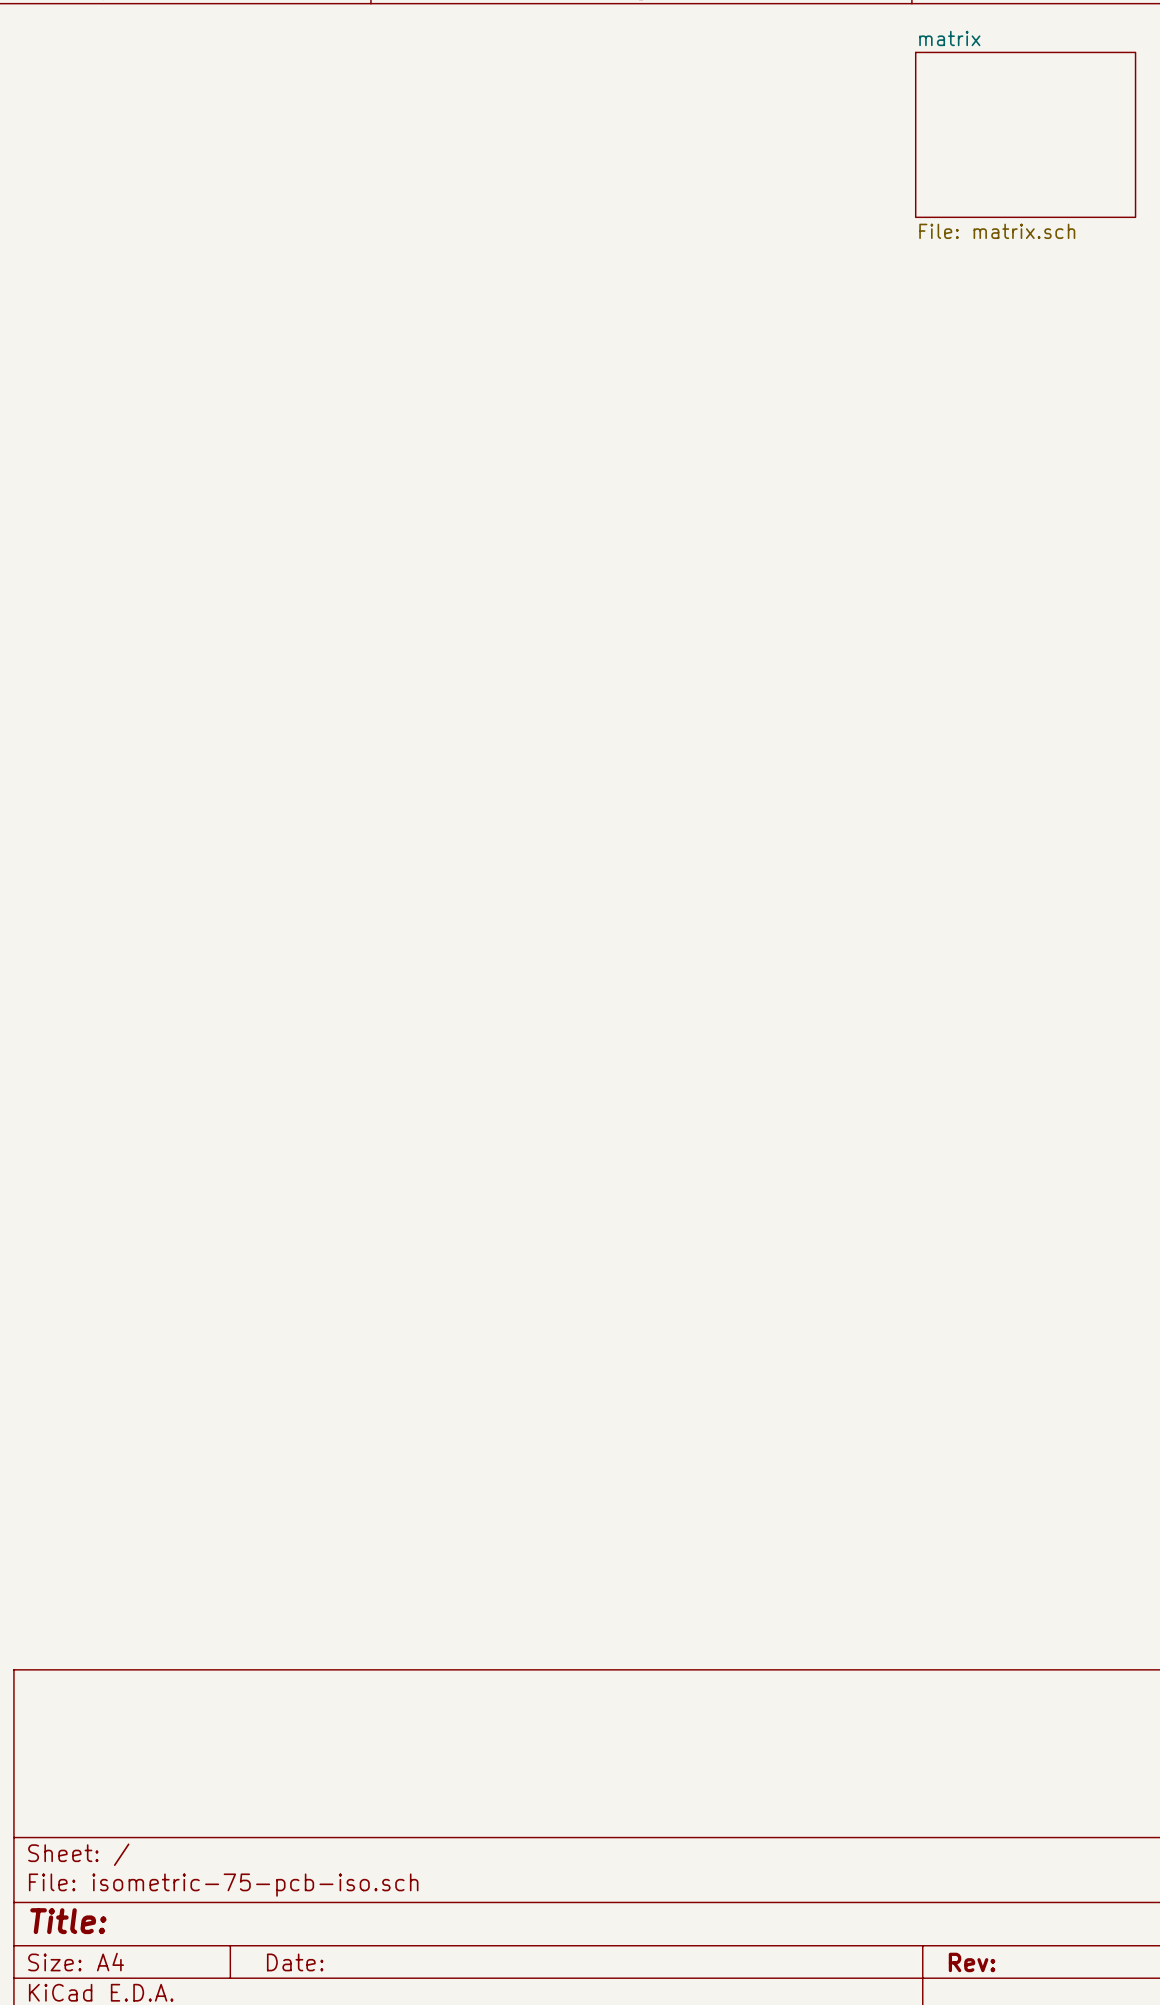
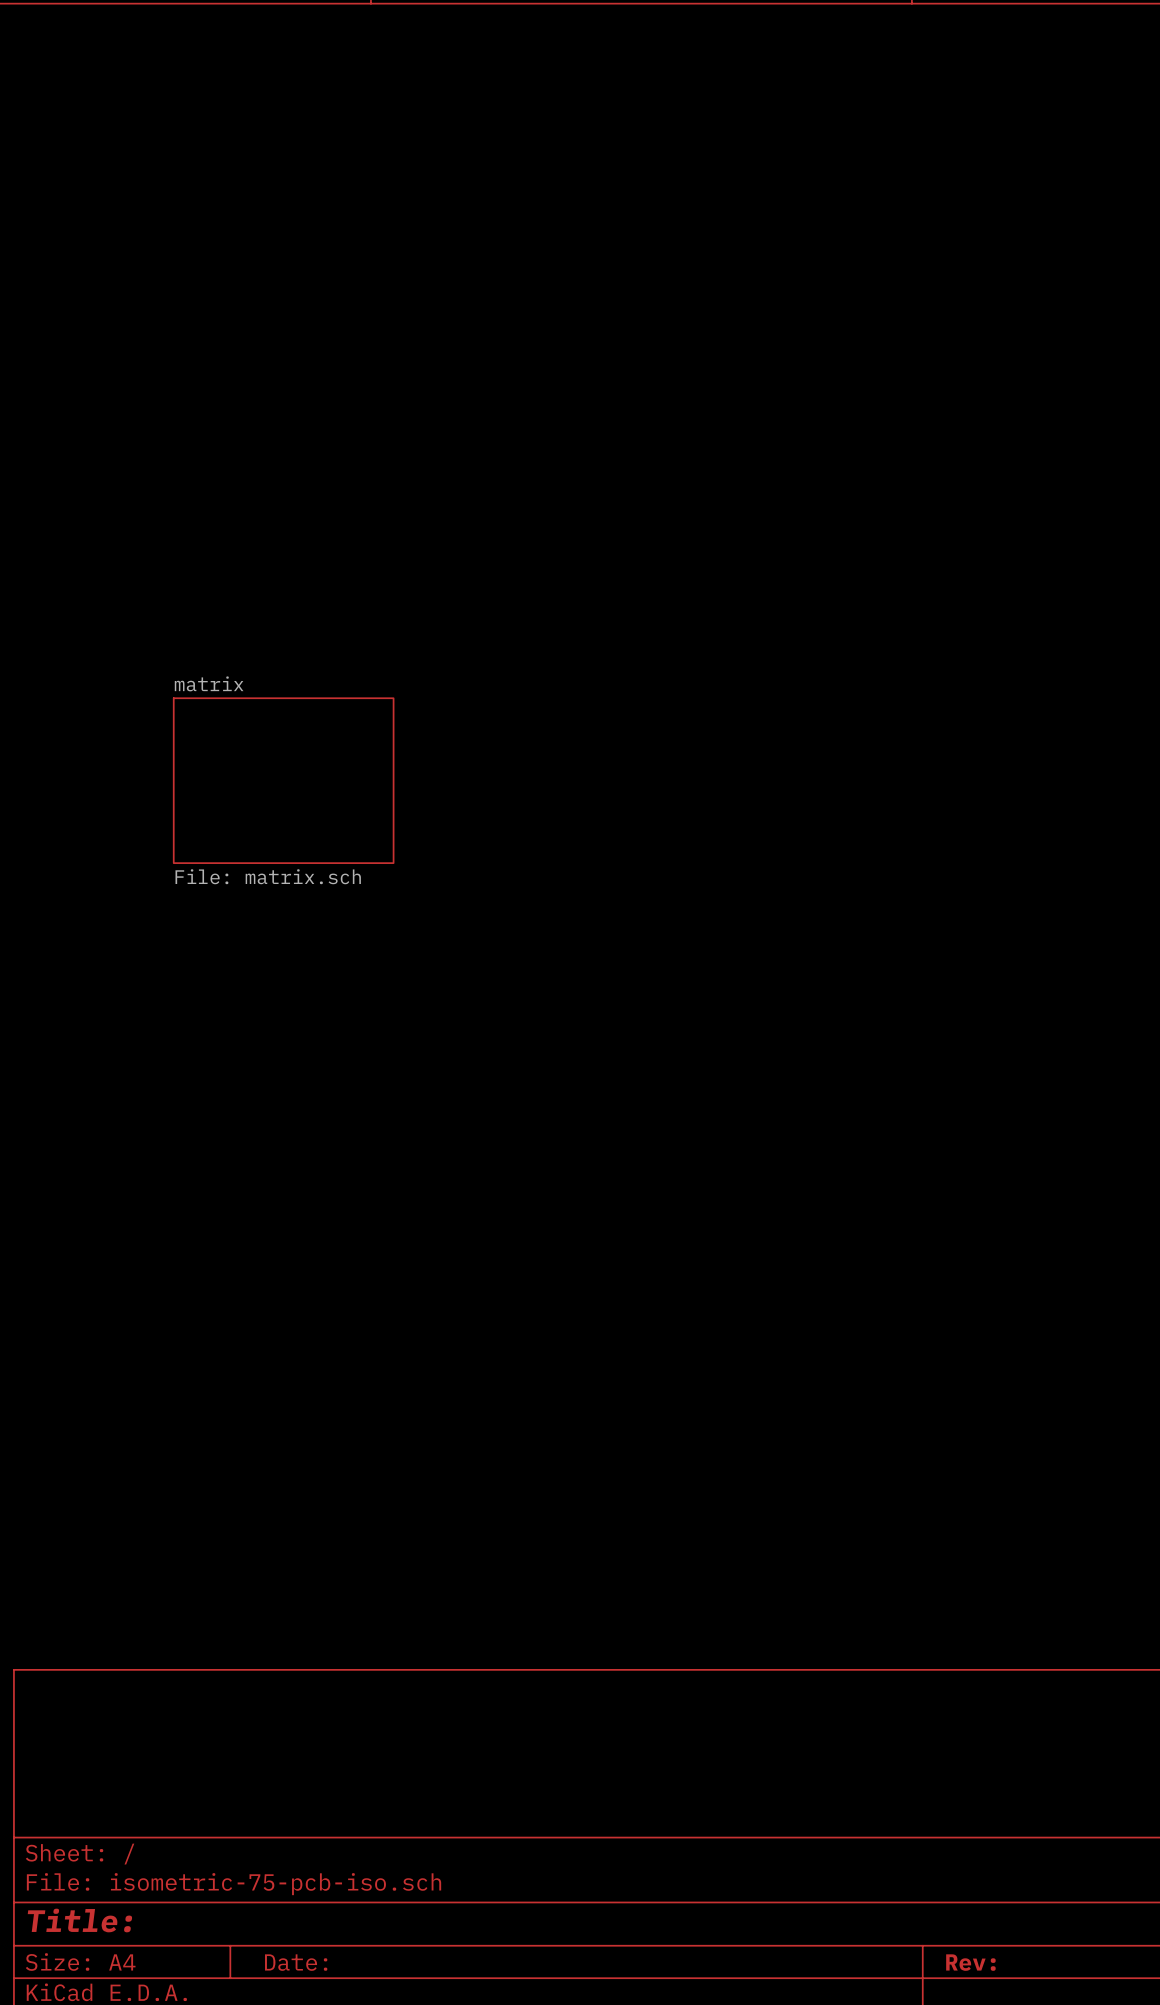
sheet matrix: File: matrix.sch (1025, 134) -> none
sheet matrix: none -> File: matrix.sch (283, 780)

